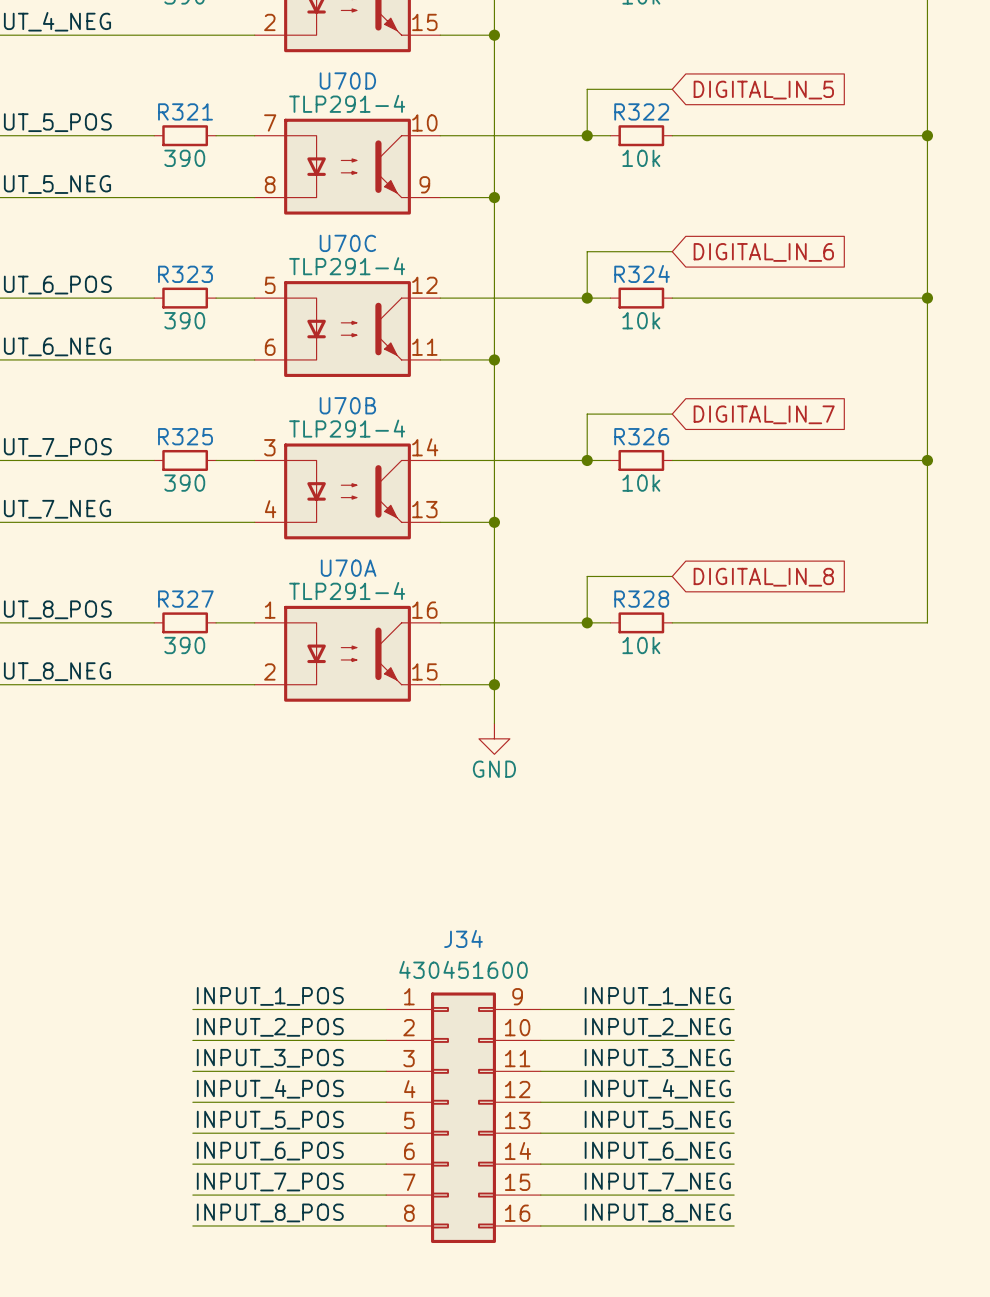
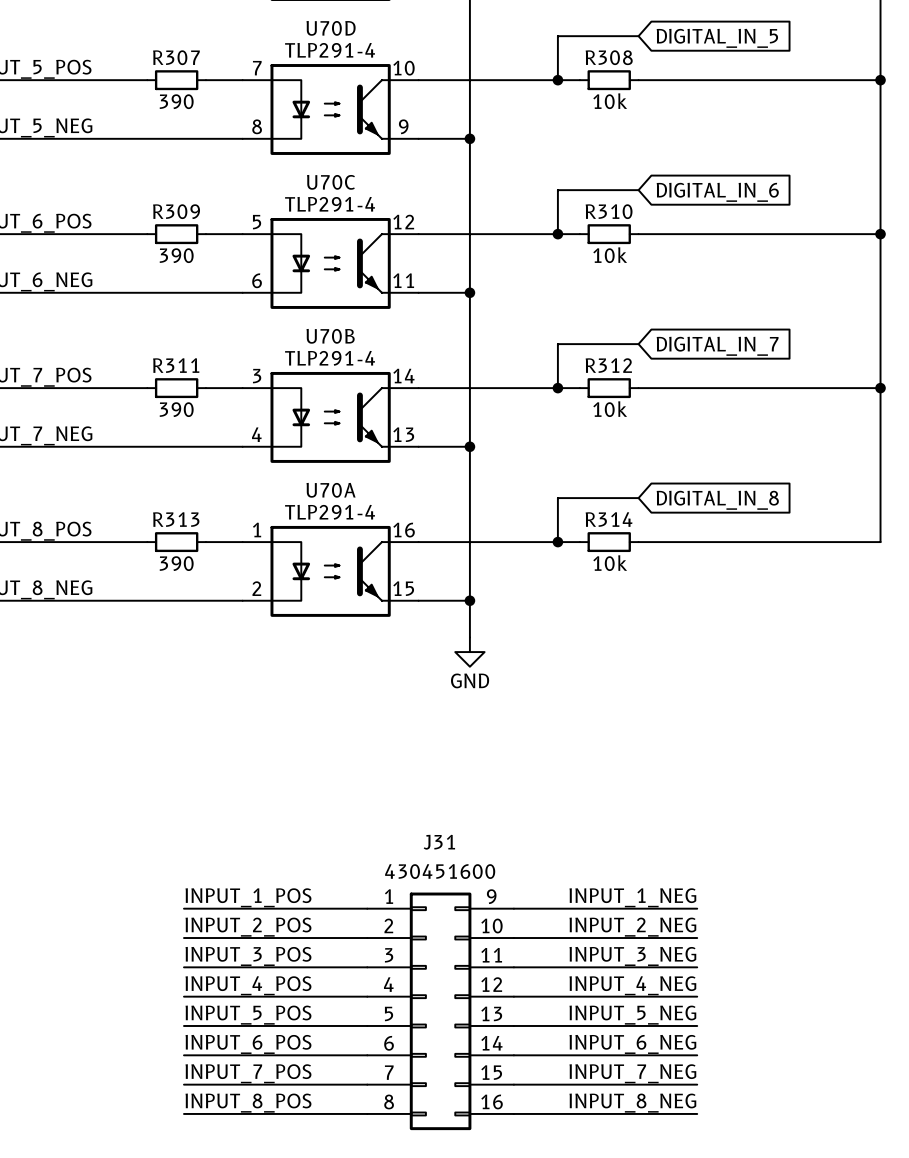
R321 name: R321 (185, 111) -> R307 (176, 57)
R322 name: R322 (641, 111) -> R308 (609, 57)
R324 name: R324 (642, 273) -> R310 (609, 211)
R323 name: R323 (185, 274) -> R309 (176, 211)
R325 name: R325 (185, 436) -> R311 (176, 365)
R326 name: R326 (641, 436) -> R312 (608, 365)
R327 name: R327 (185, 599) -> R313 (176, 519)
R328 name: R328 (641, 599) -> R314 (609, 519)
J34 name: J34 (463, 938) -> J31 (439, 842)

